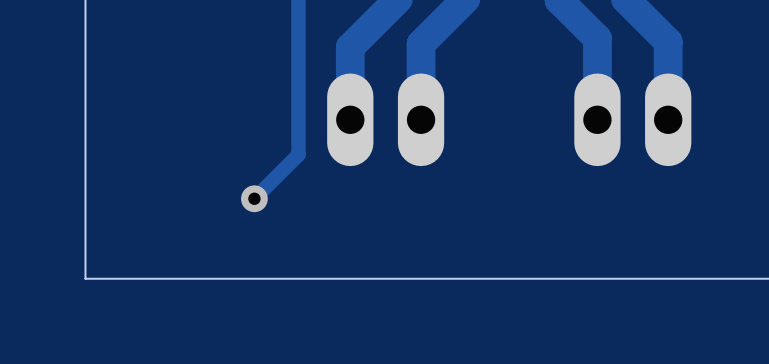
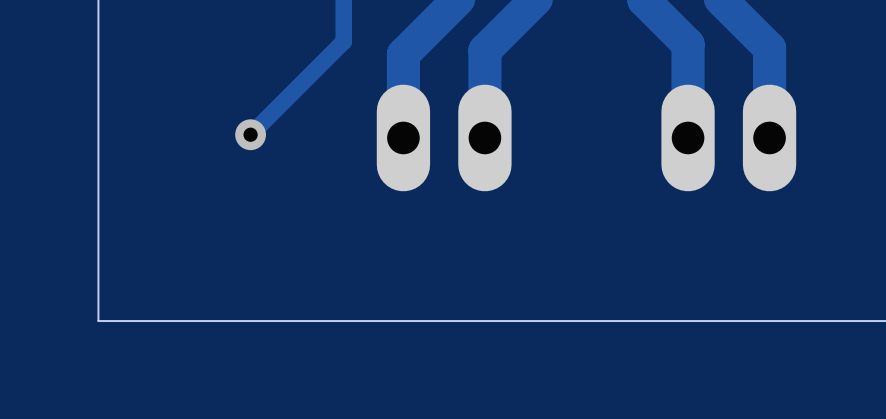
track: (298, 36) (298, 154) (254, 198) -> (343, 41) (250, 134)
via position: (254, 198) -> (250, 134)

